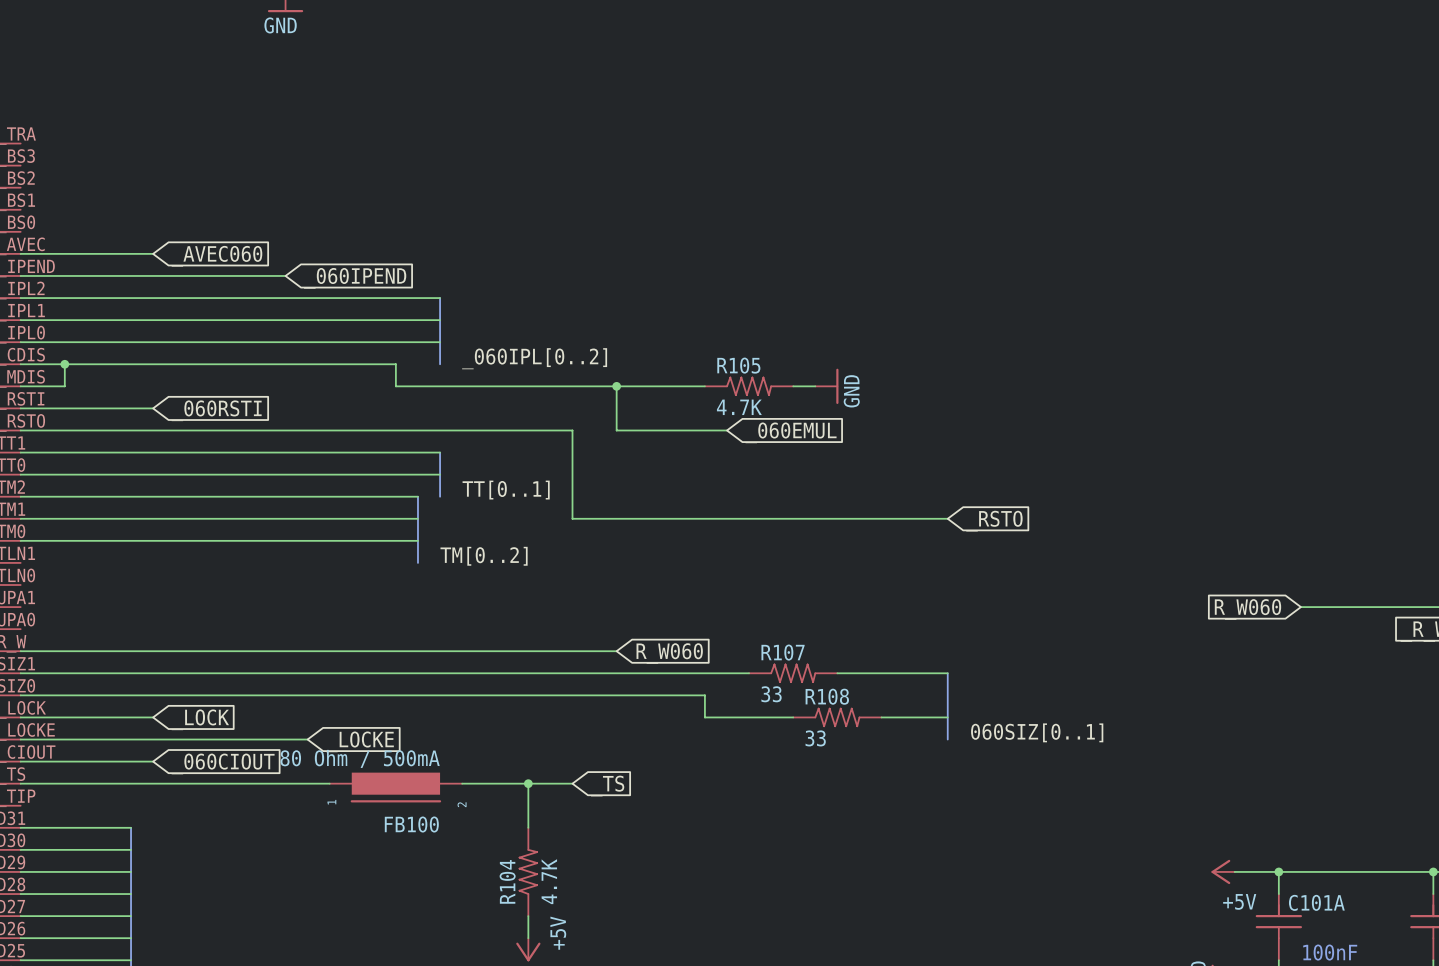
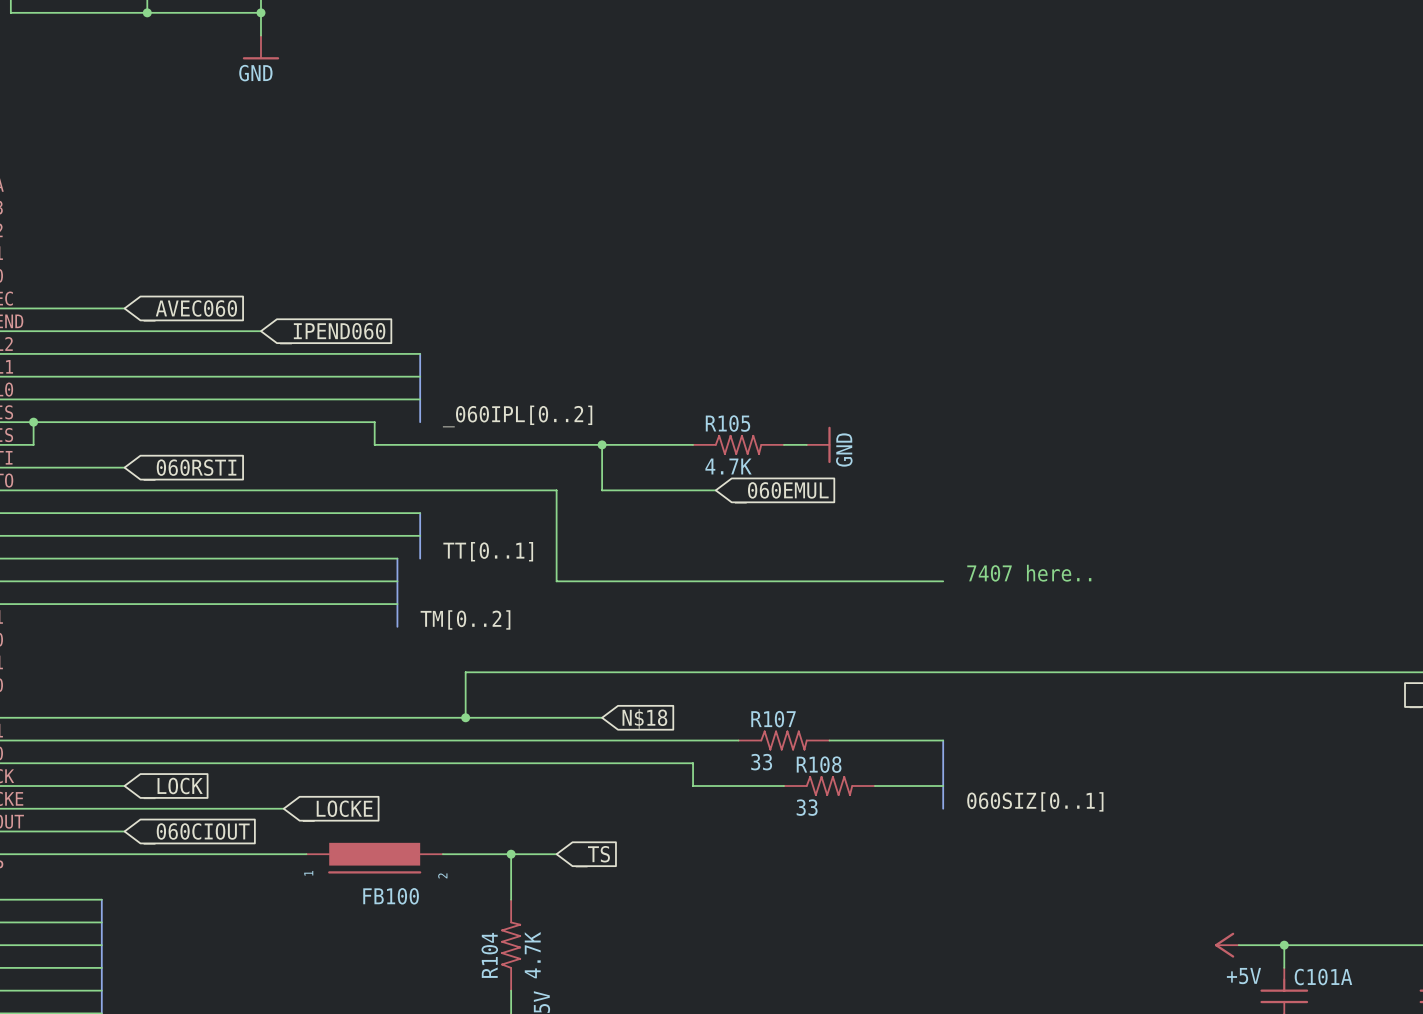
global label: _060IPEND (355, 278) -> _IPEND060 (332, 333)
text: none -> 7407 here.. (1029, 573)
global label: _RSTO (994, 521) -> none
wire: none -> (1307, 672) (465, 672) (465, 717)
global label: R_W060 (1247, 609) -> none
junction: none -> (465, 717)
global label: R_W060 (669, 653) -> N$18 (644, 719)
FB100 value: 80 Ohm / 500mA (360, 758) -> none

